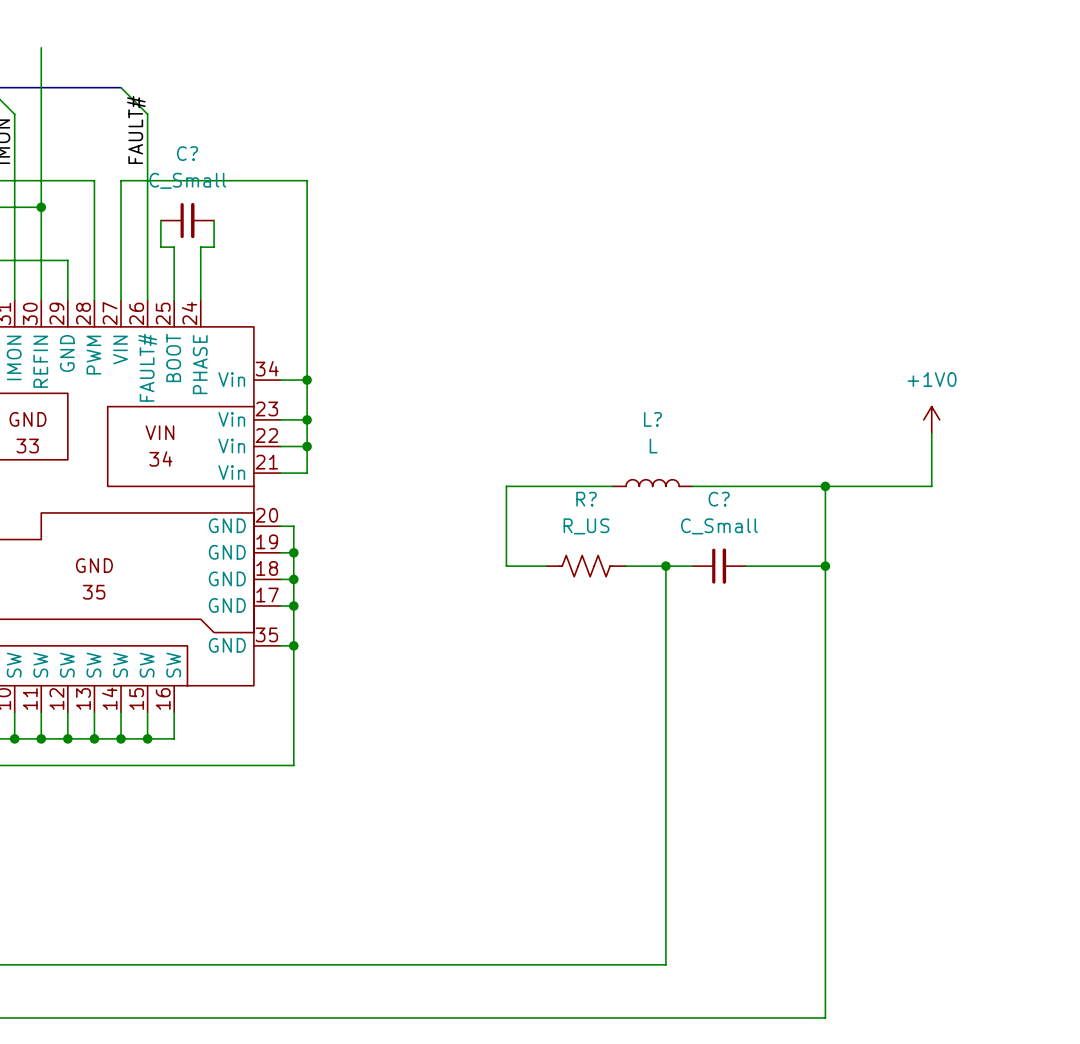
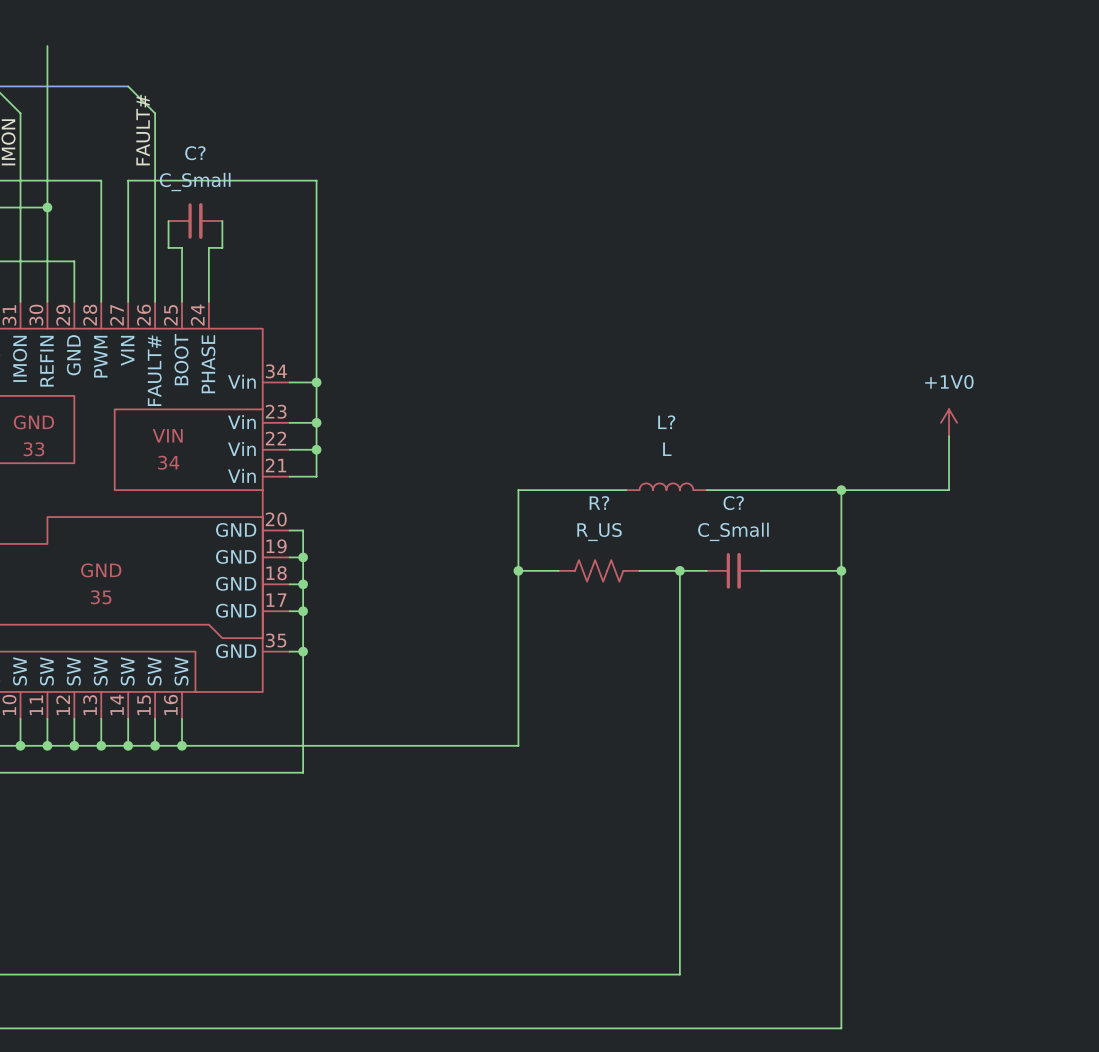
wire: none -> (518, 570) (518, 745) (182, 745)
junction: none -> (518, 570)
junction: none -> (182, 745)

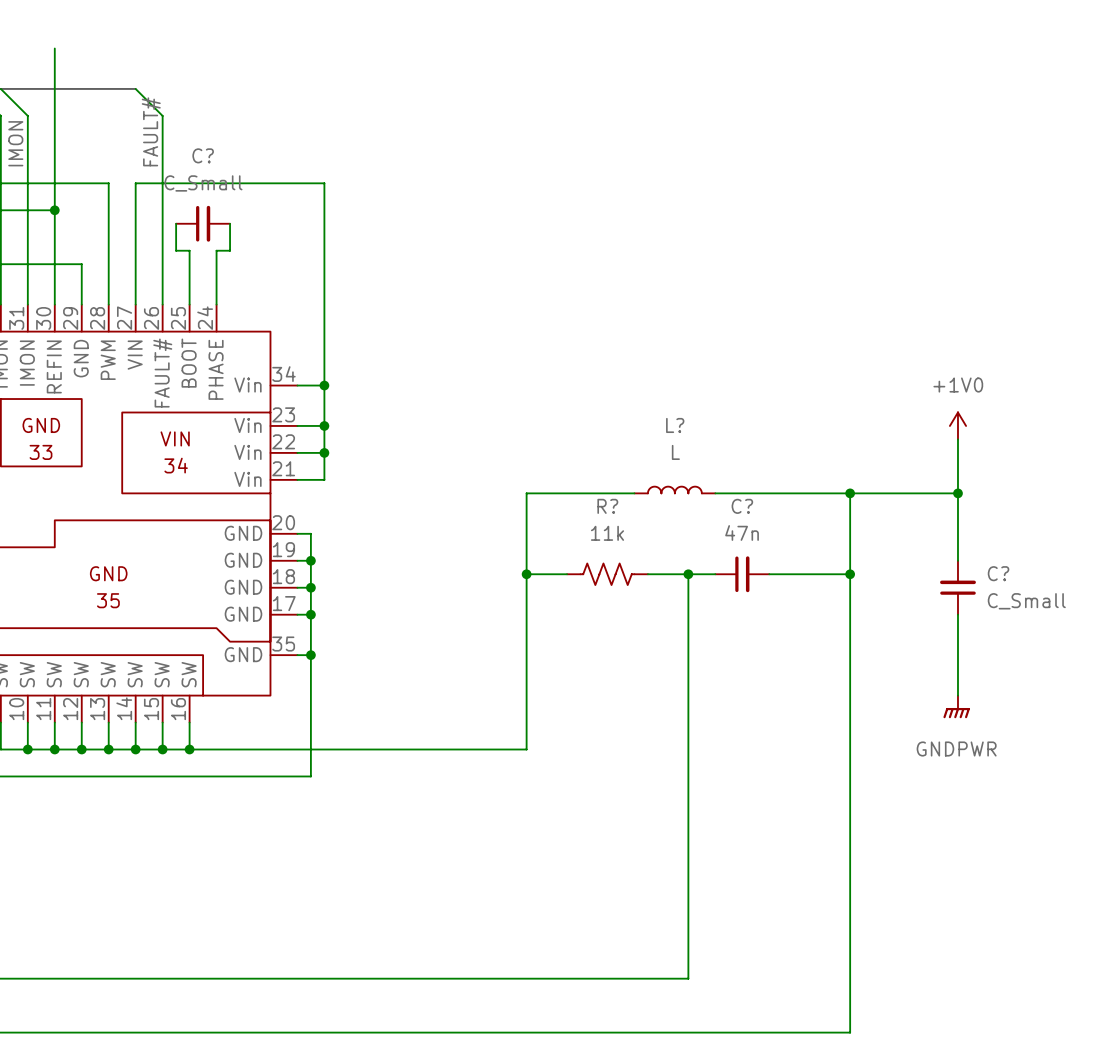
wire: none -> (957, 493) (957, 560)
junction: none -> (957, 493)
C? value: C_Small (733, 531) -> 47n (742, 532)
R? value: R_US (599, 532) -> 11k (607, 533)
C?: none -> C_Small (957, 587)
wire: none -> (957, 614) (957, 695)
power symbol: none -> GNDPWR (956, 706)

